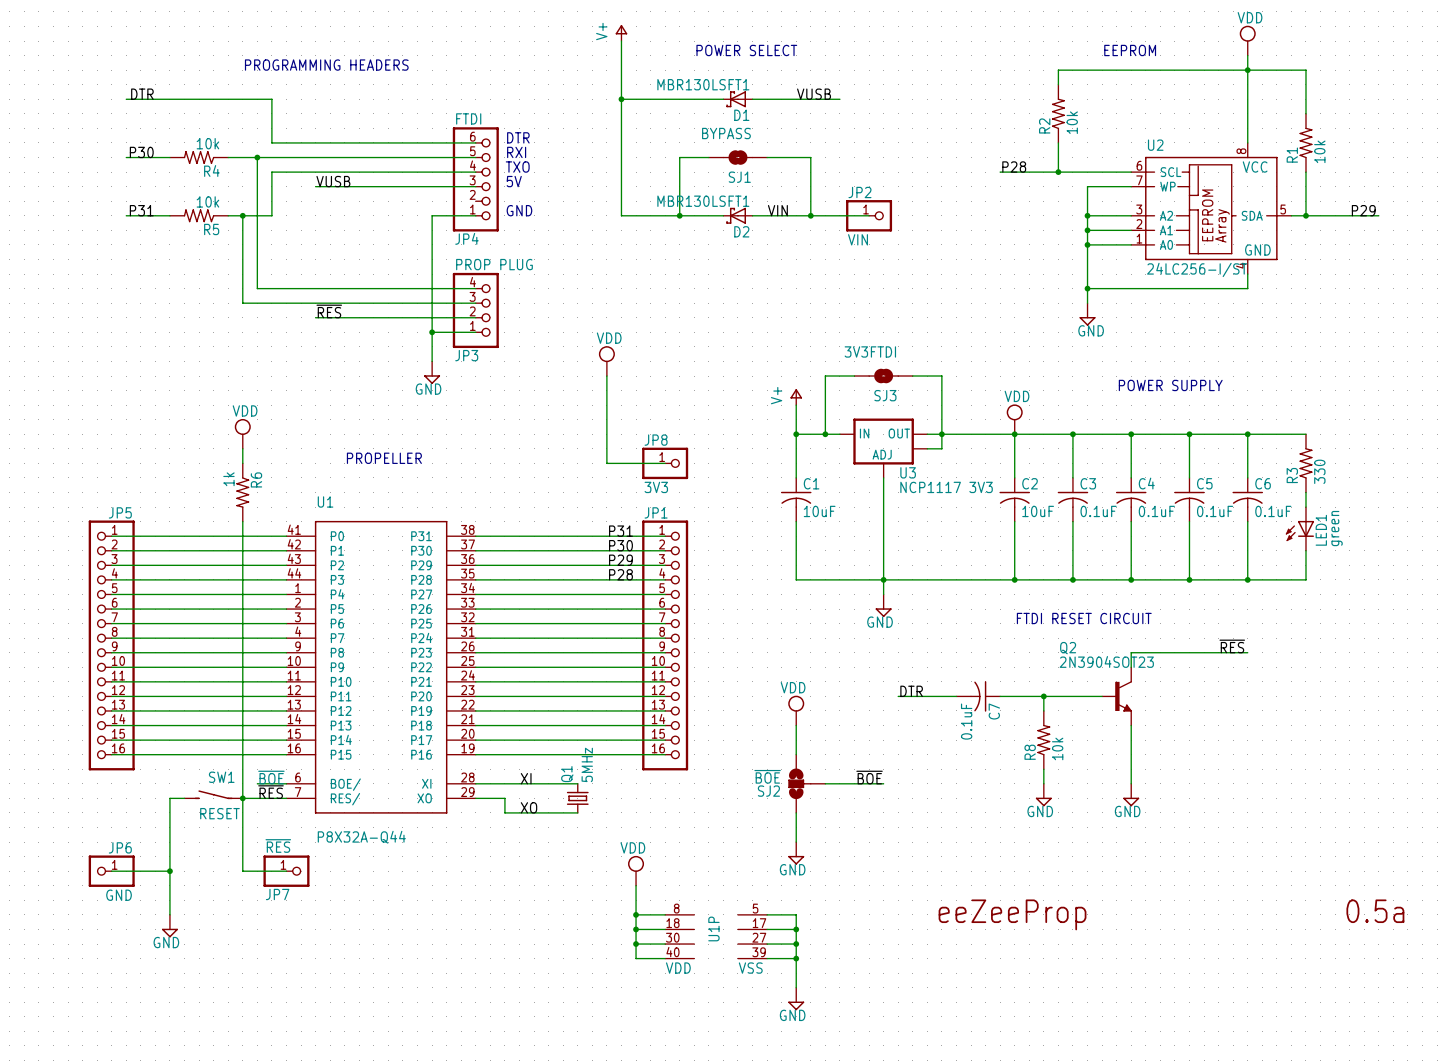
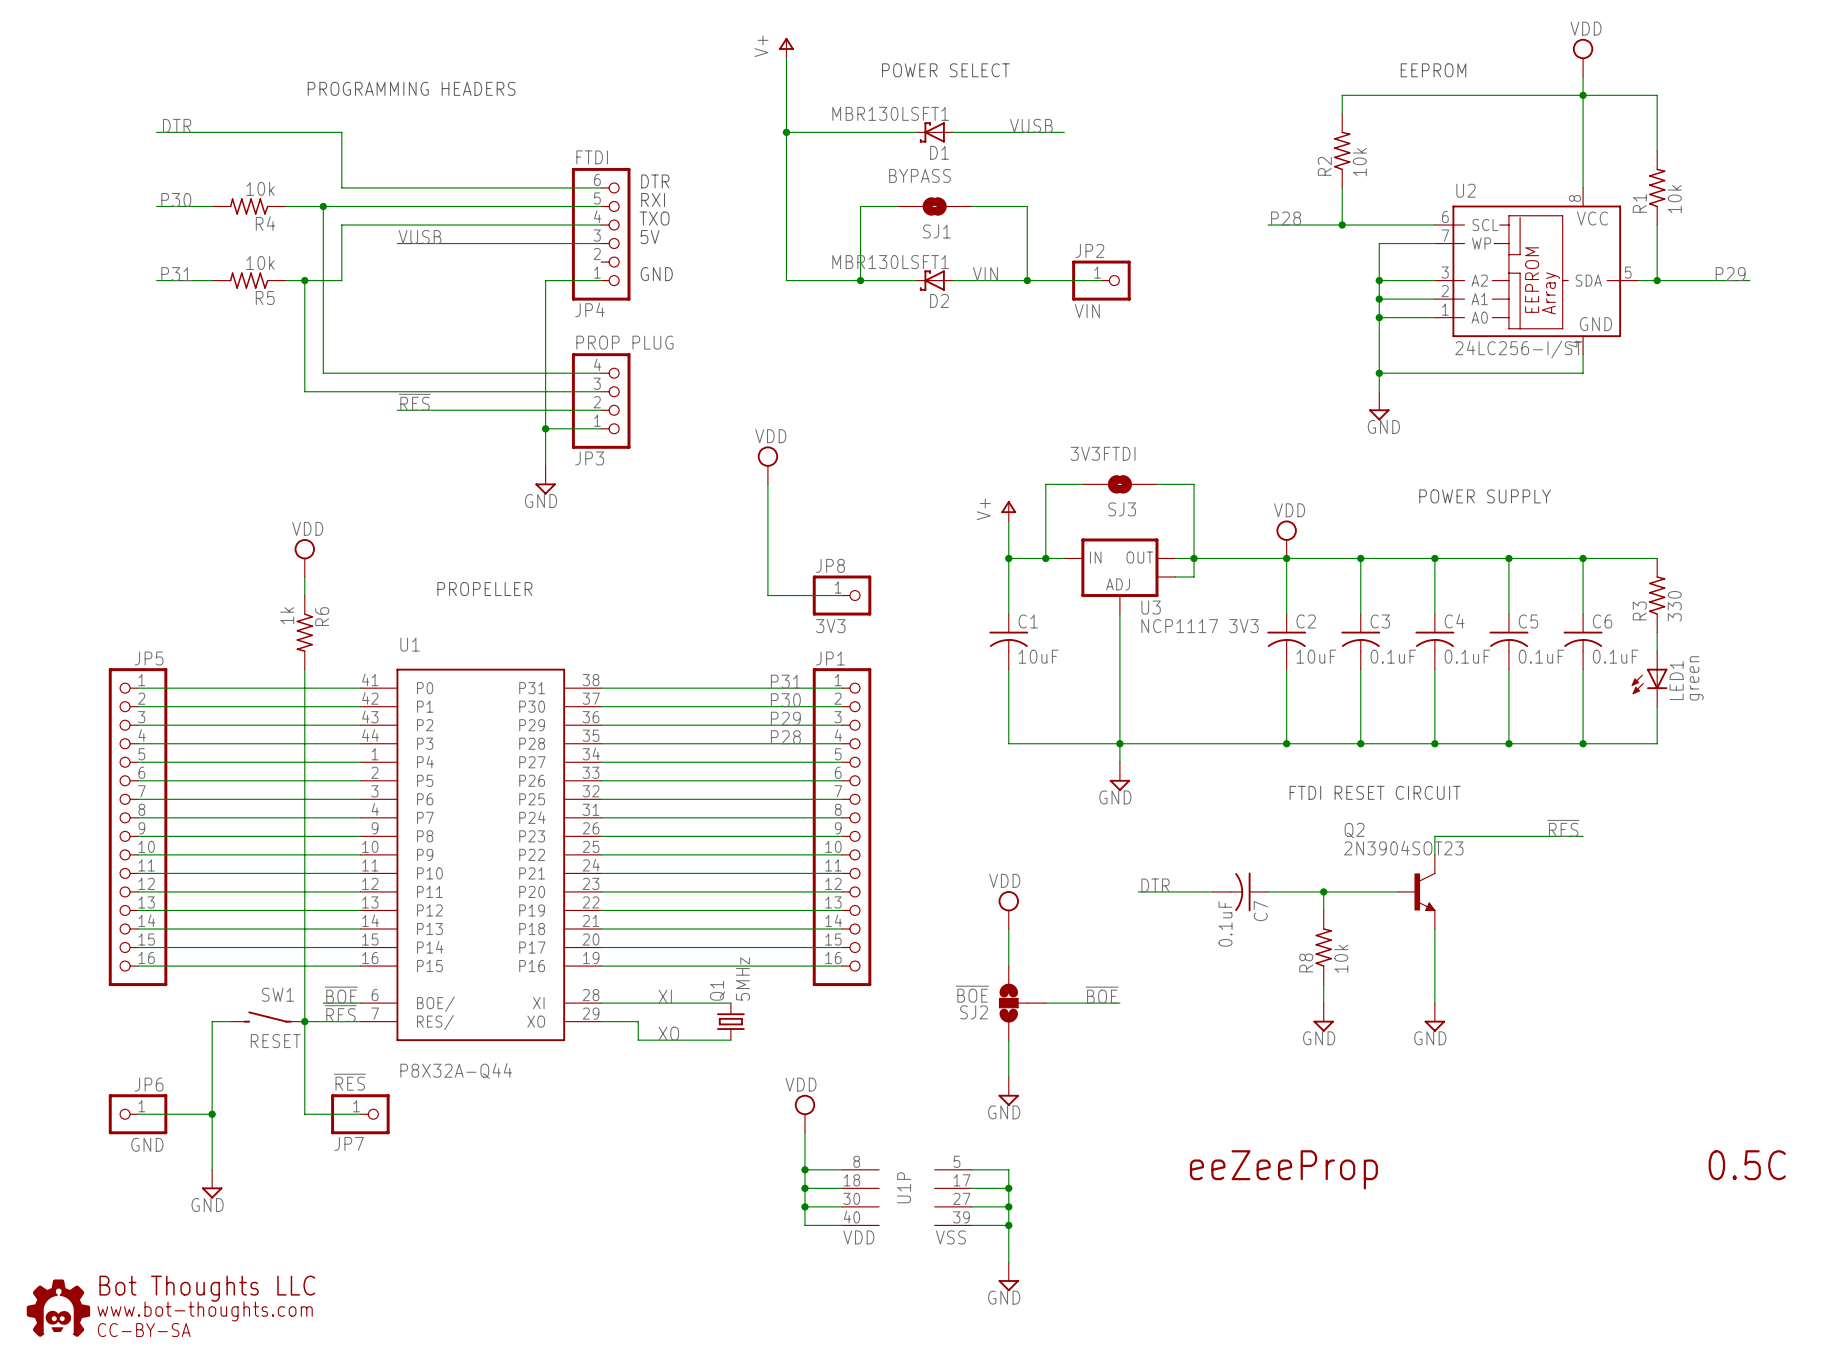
text: 0.5a (1375, 911) -> 0.5C (1747, 1165)
part: none -> (58, 1308)

